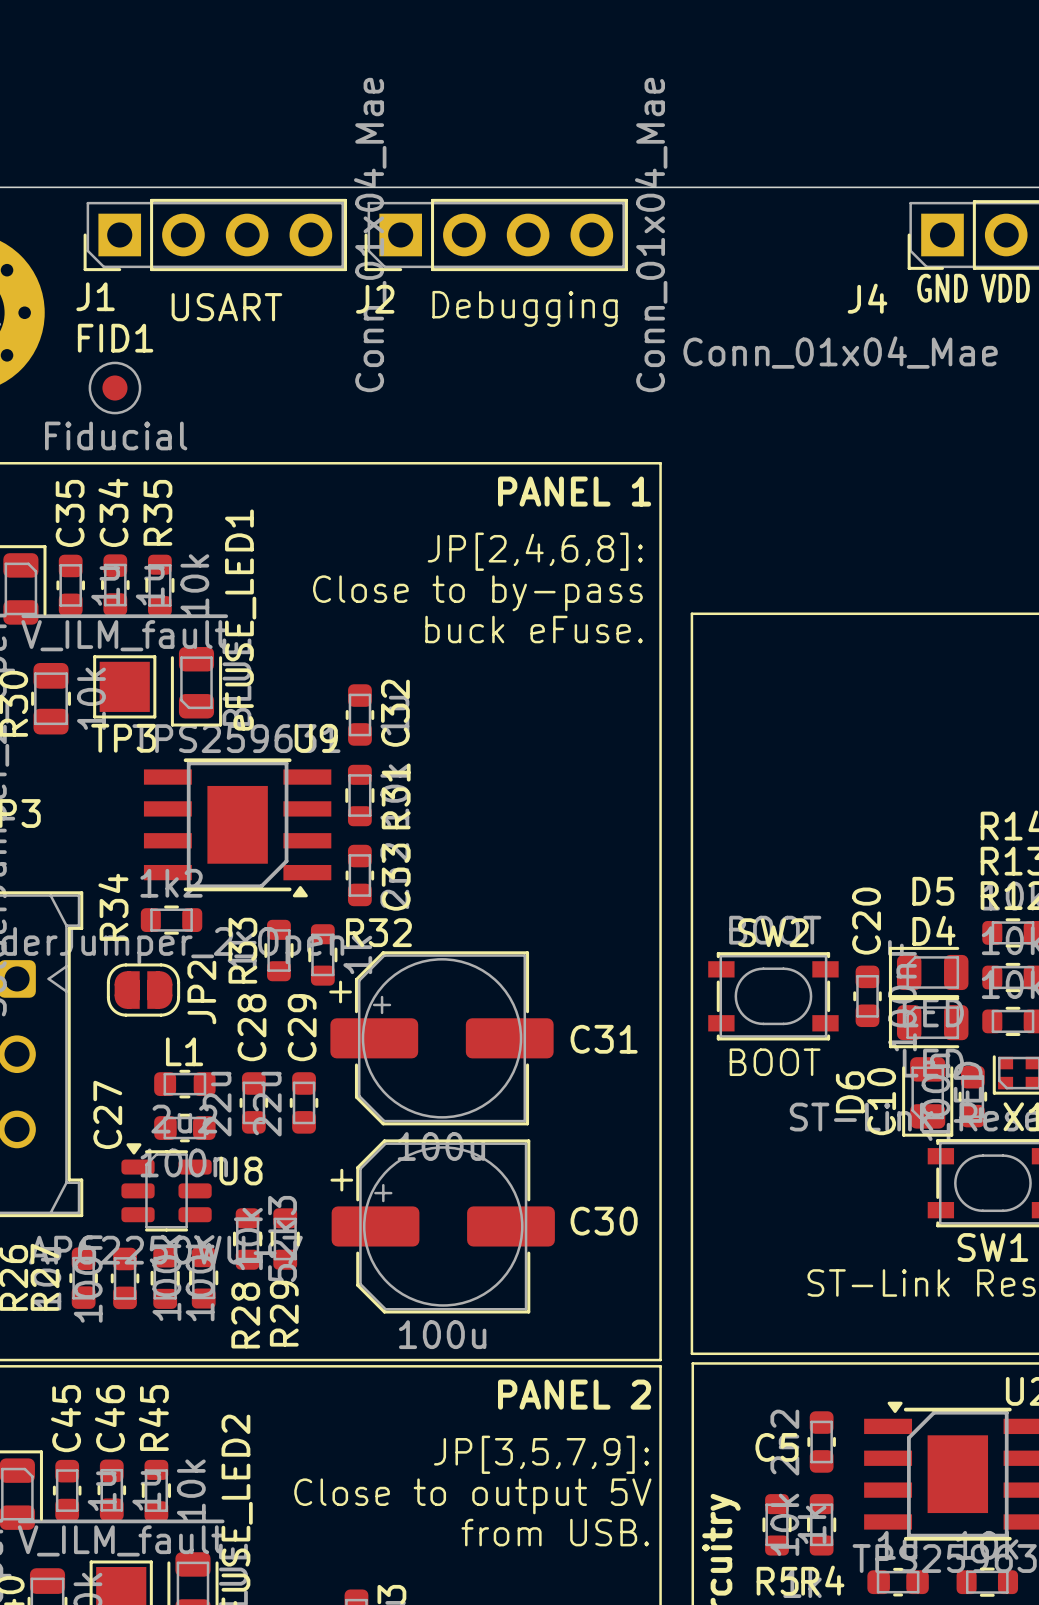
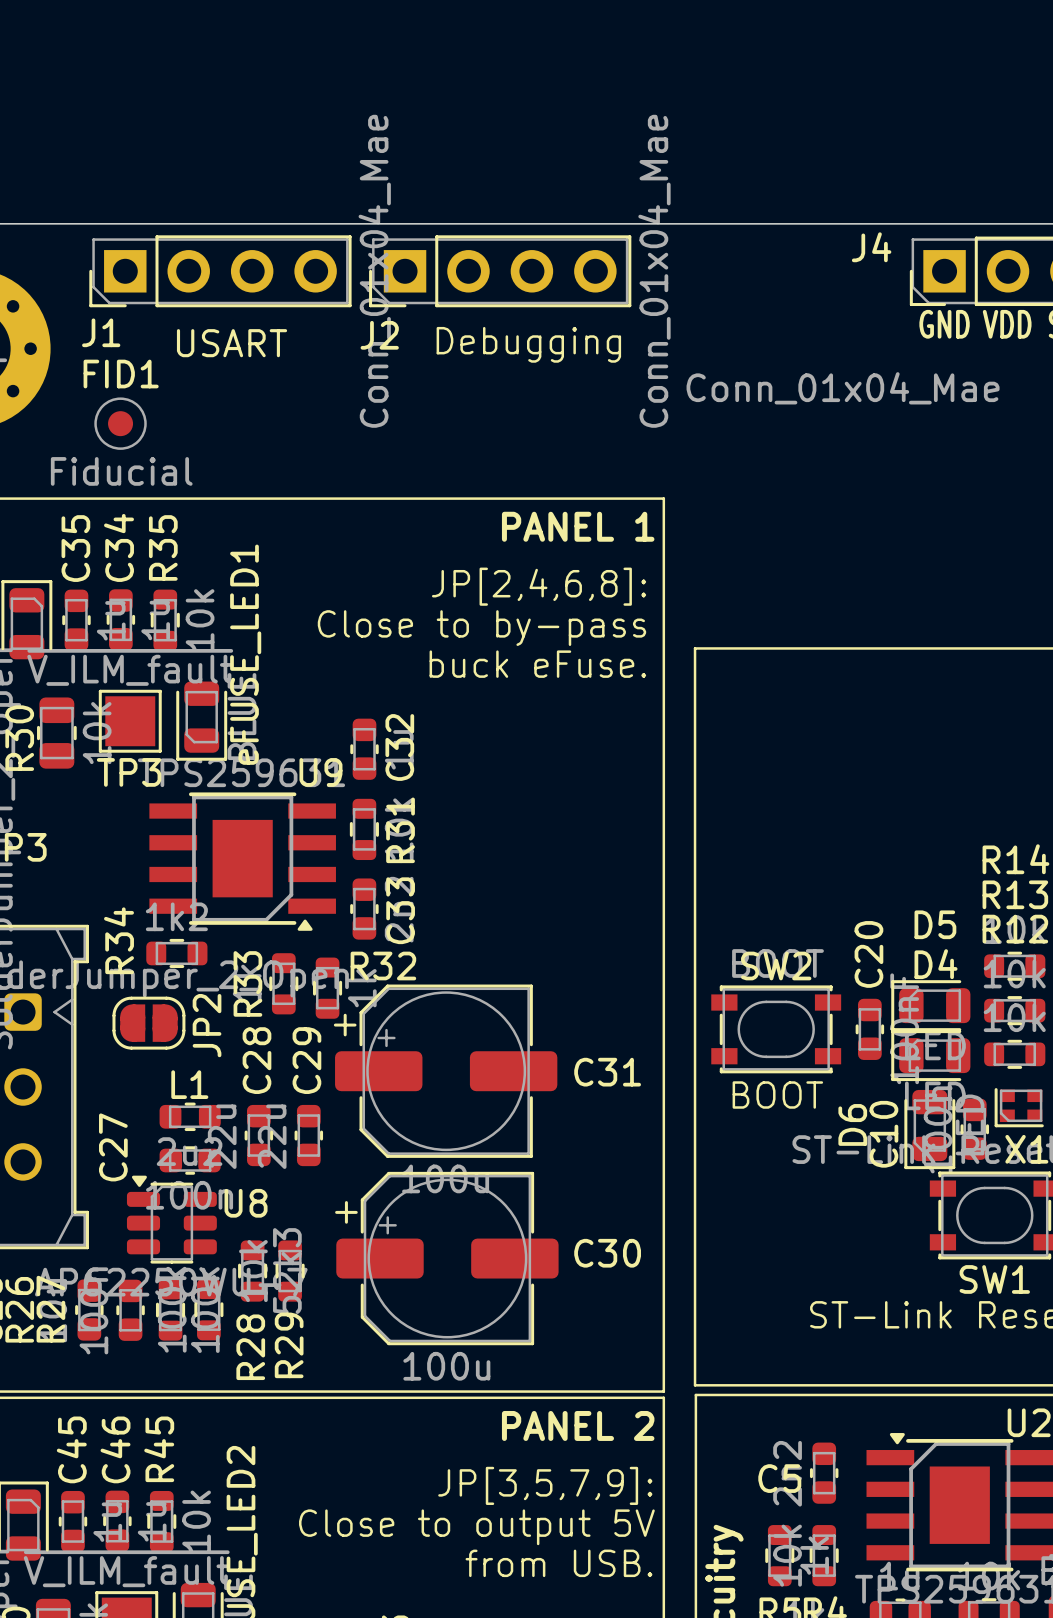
J4 name position: J4 (867, 298) -> J4 (871, 247)

